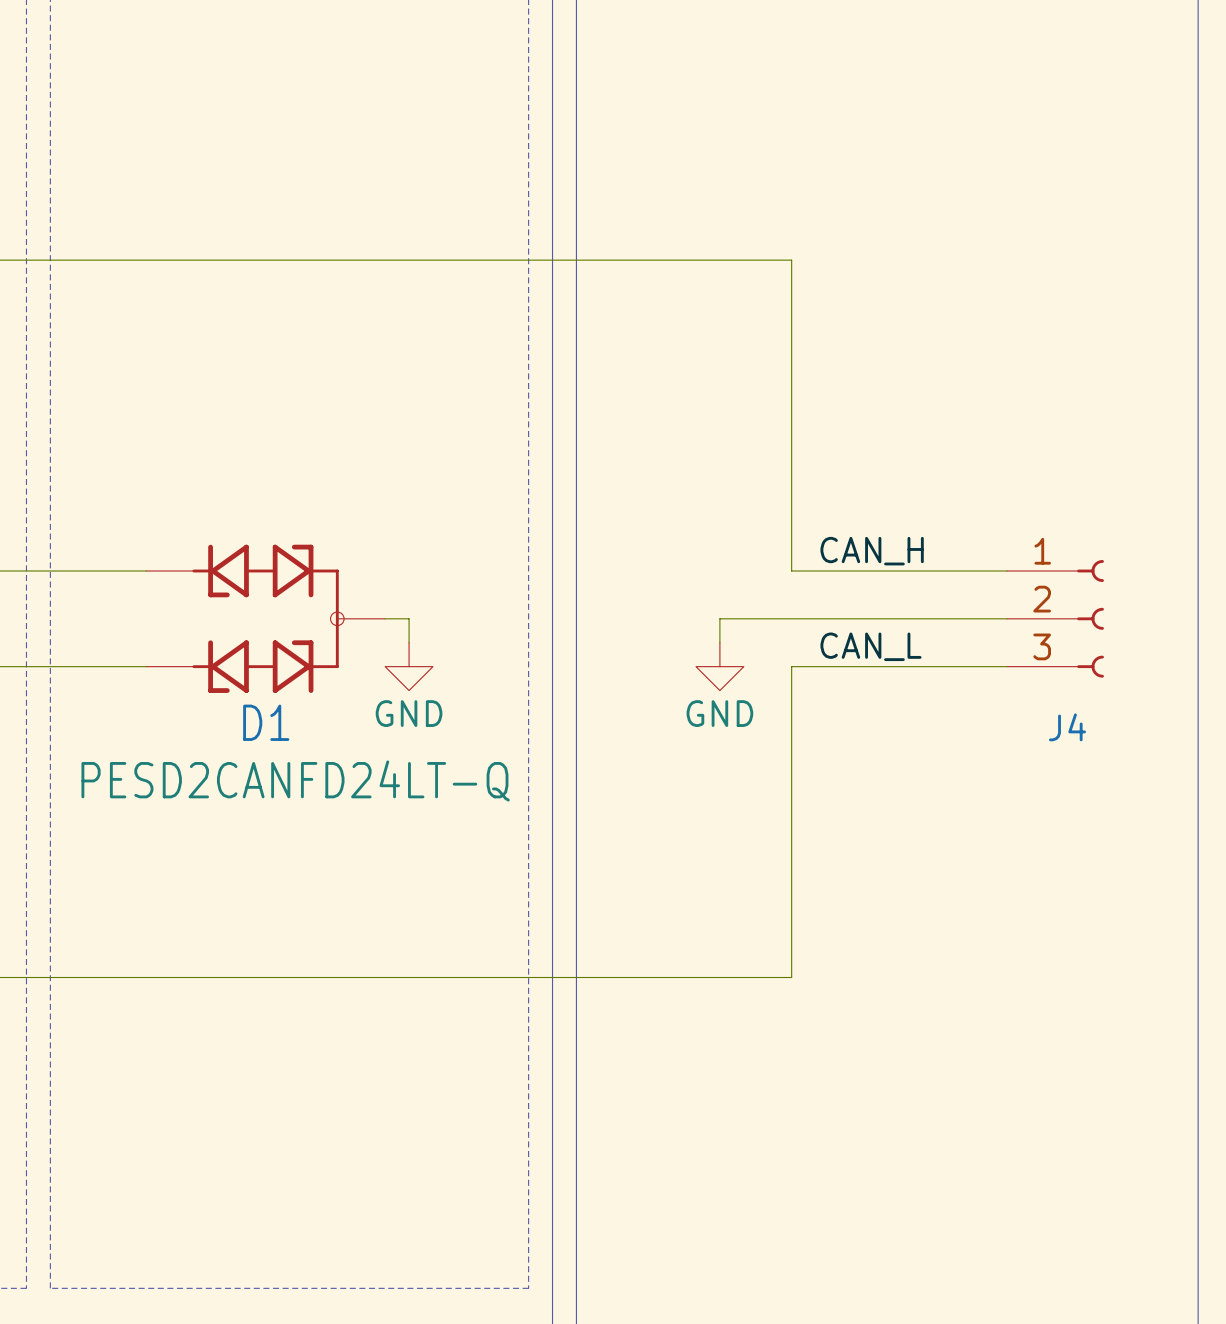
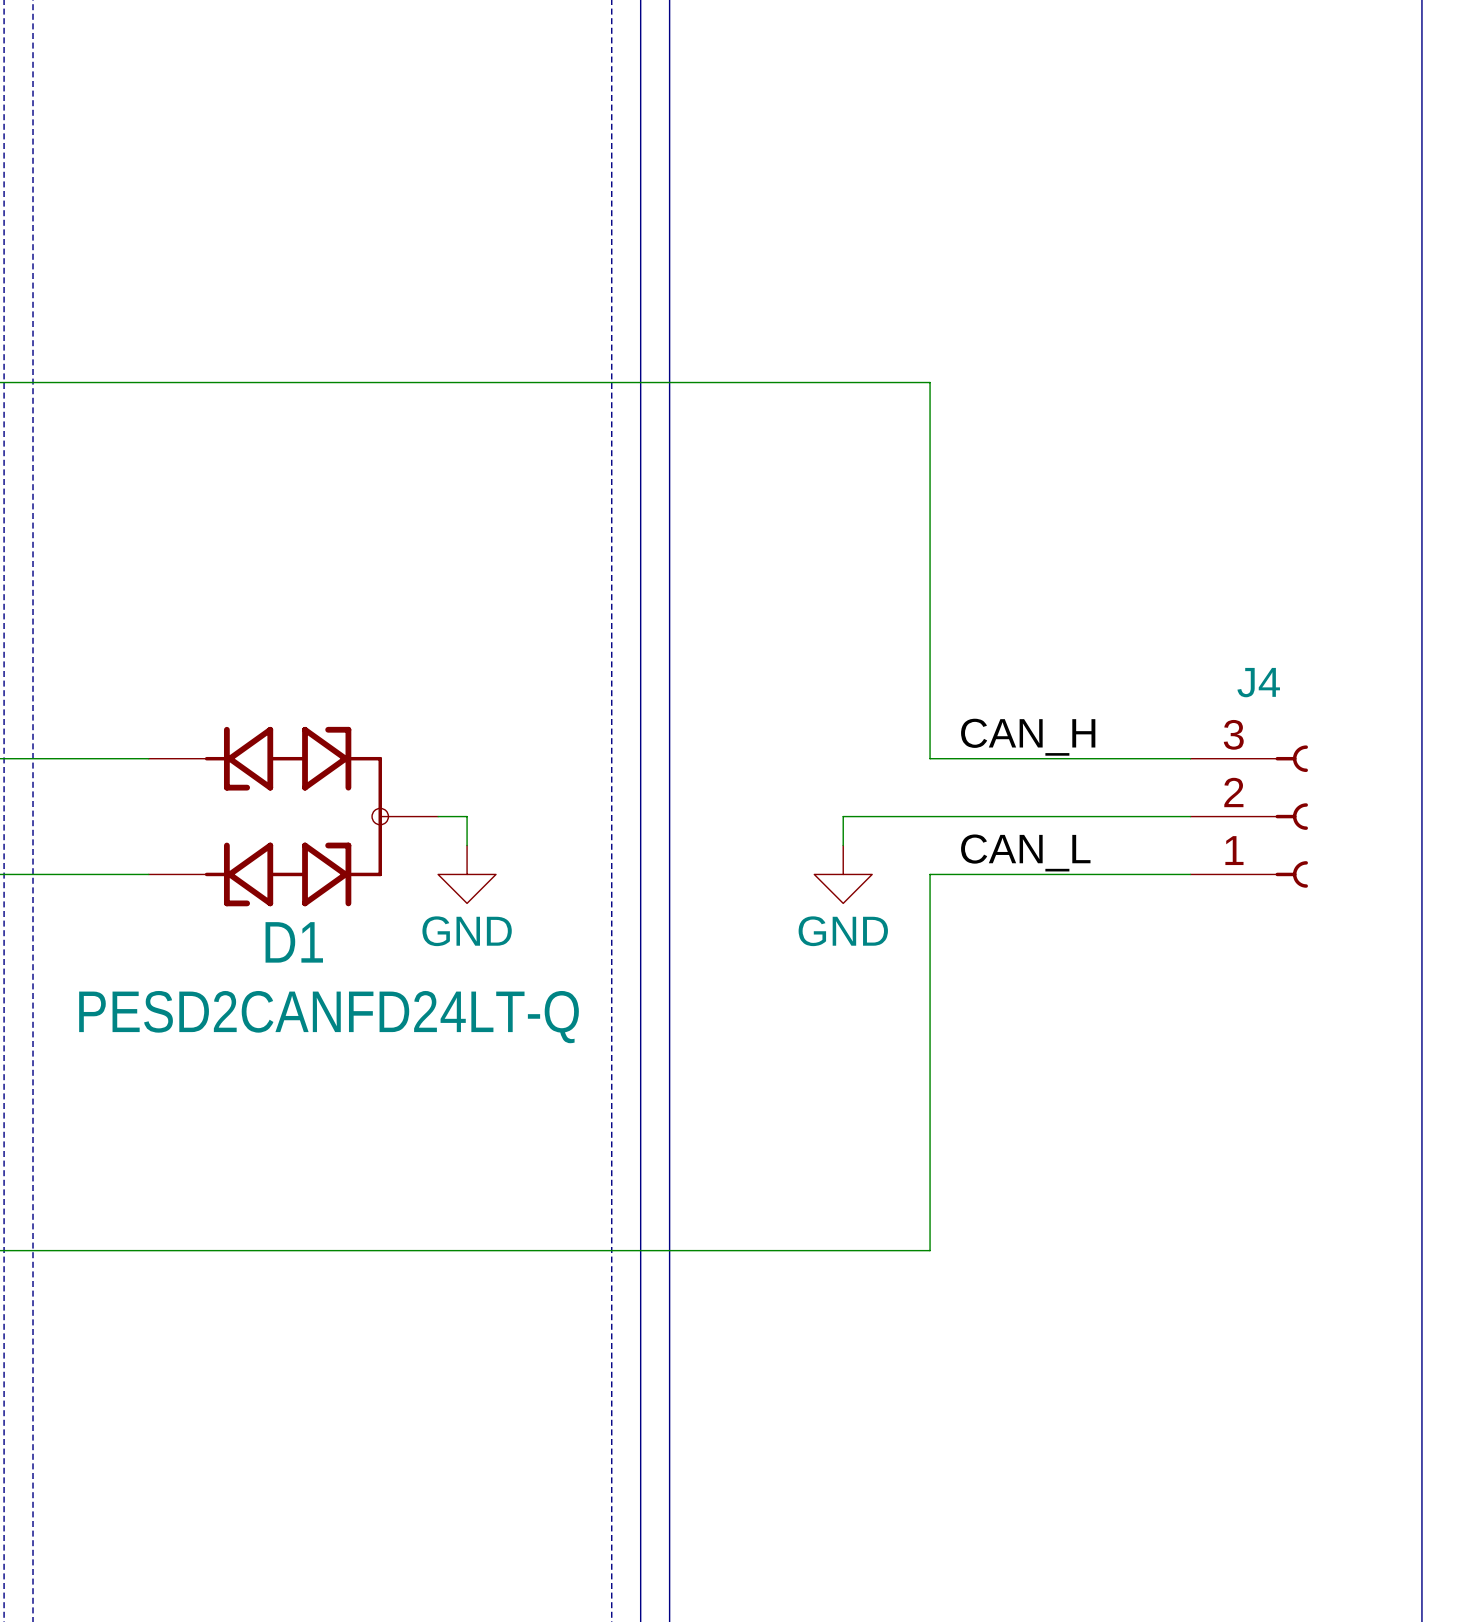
J4 flip: as is (1090, 618) -> up-down (1291, 816)

